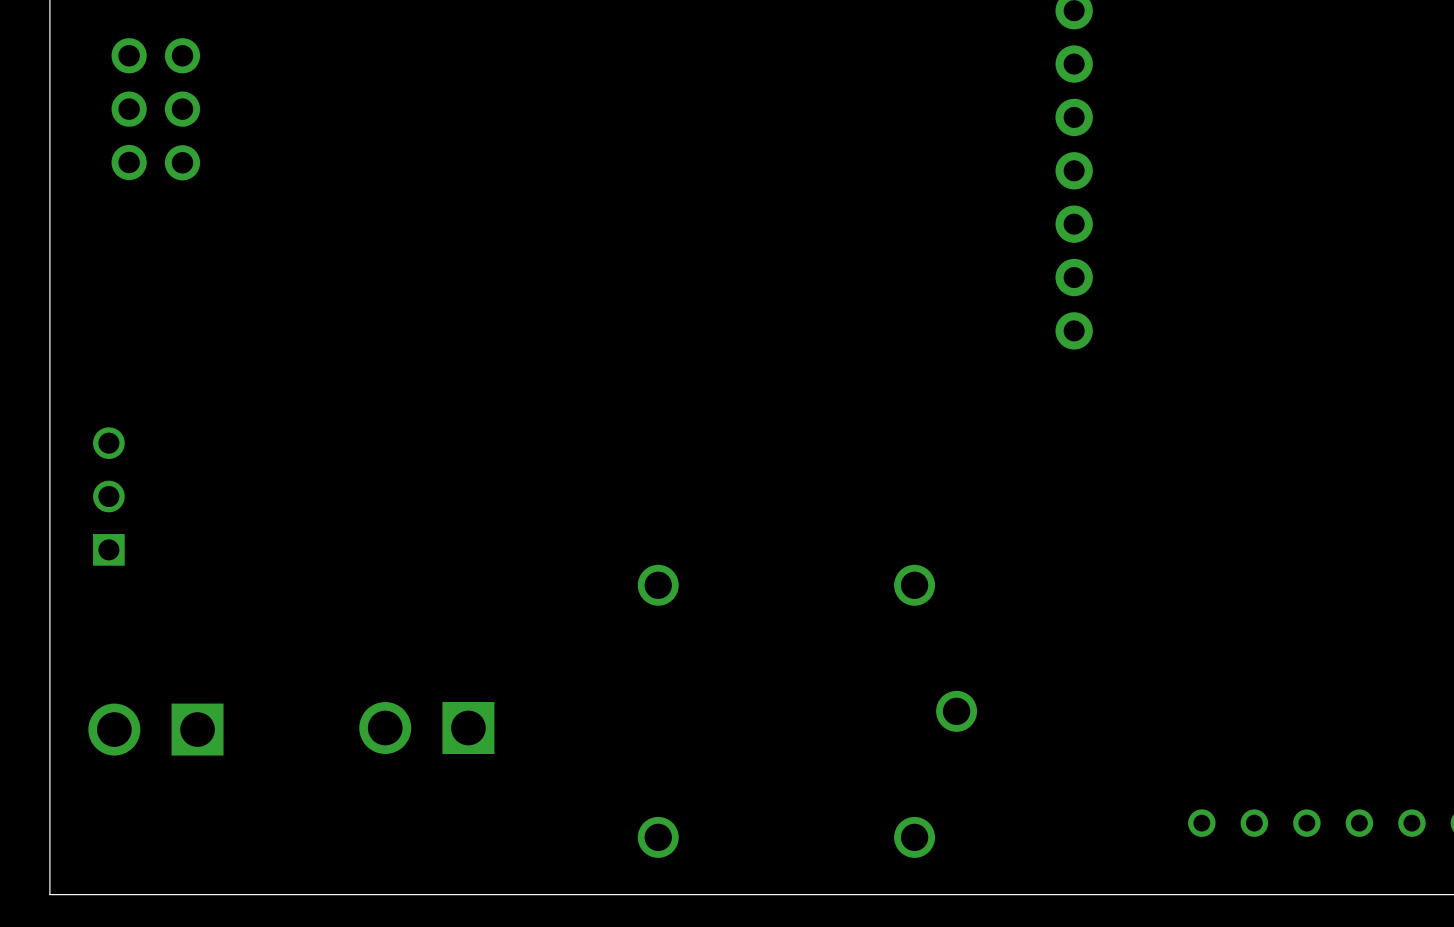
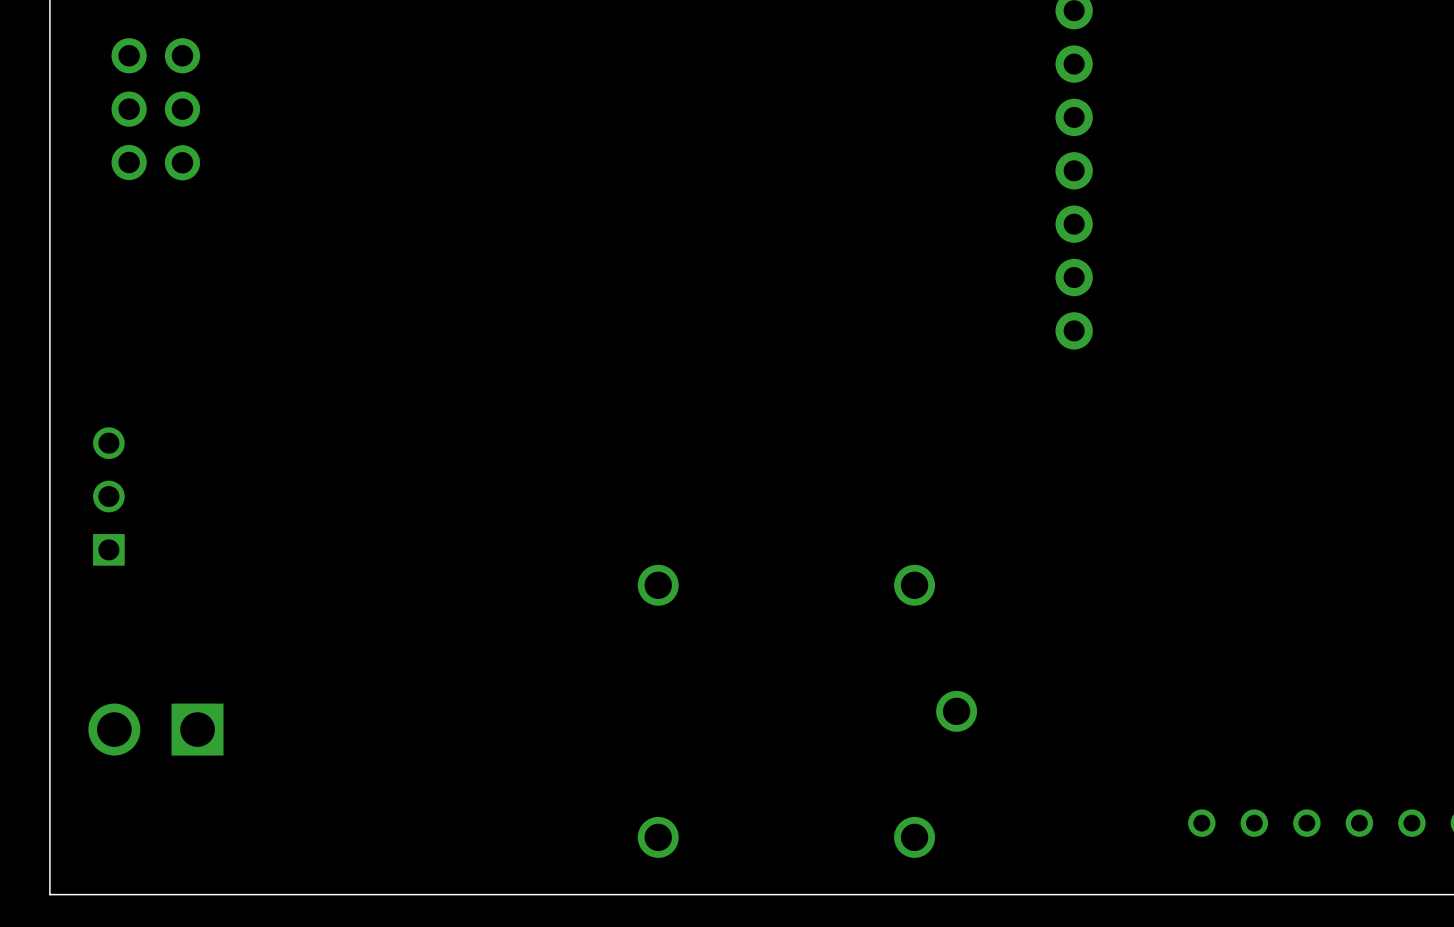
part: (426, 728) -> none

